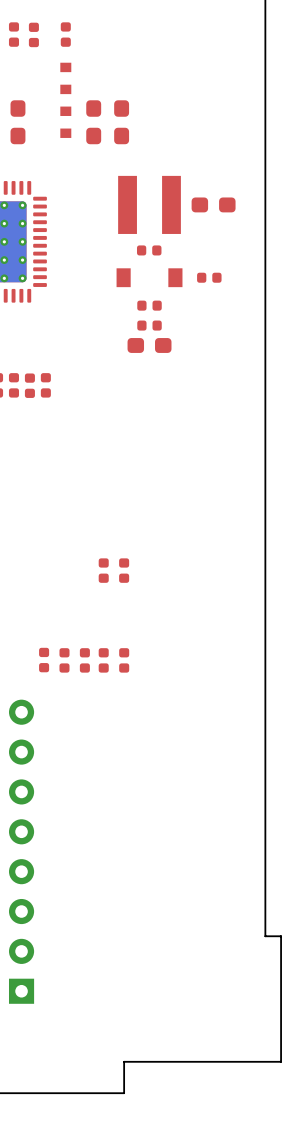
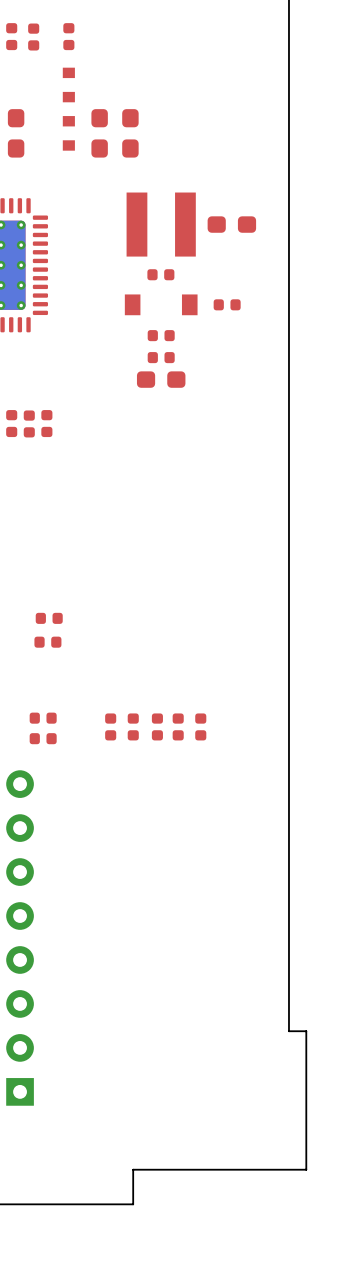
part: none -> (49, 618)
part: (103, 570) -> none
part: (124, 570) -> none
part: none -> (47, 642)
part: none -> (43, 718)
part: (44, 660) -> none
part: (64, 660) -> none
part: (84, 660) -> none
part: none -> (157, 726)
part: none -> (178, 726)
part: none -> (200, 726)
part: none -> (43, 738)

